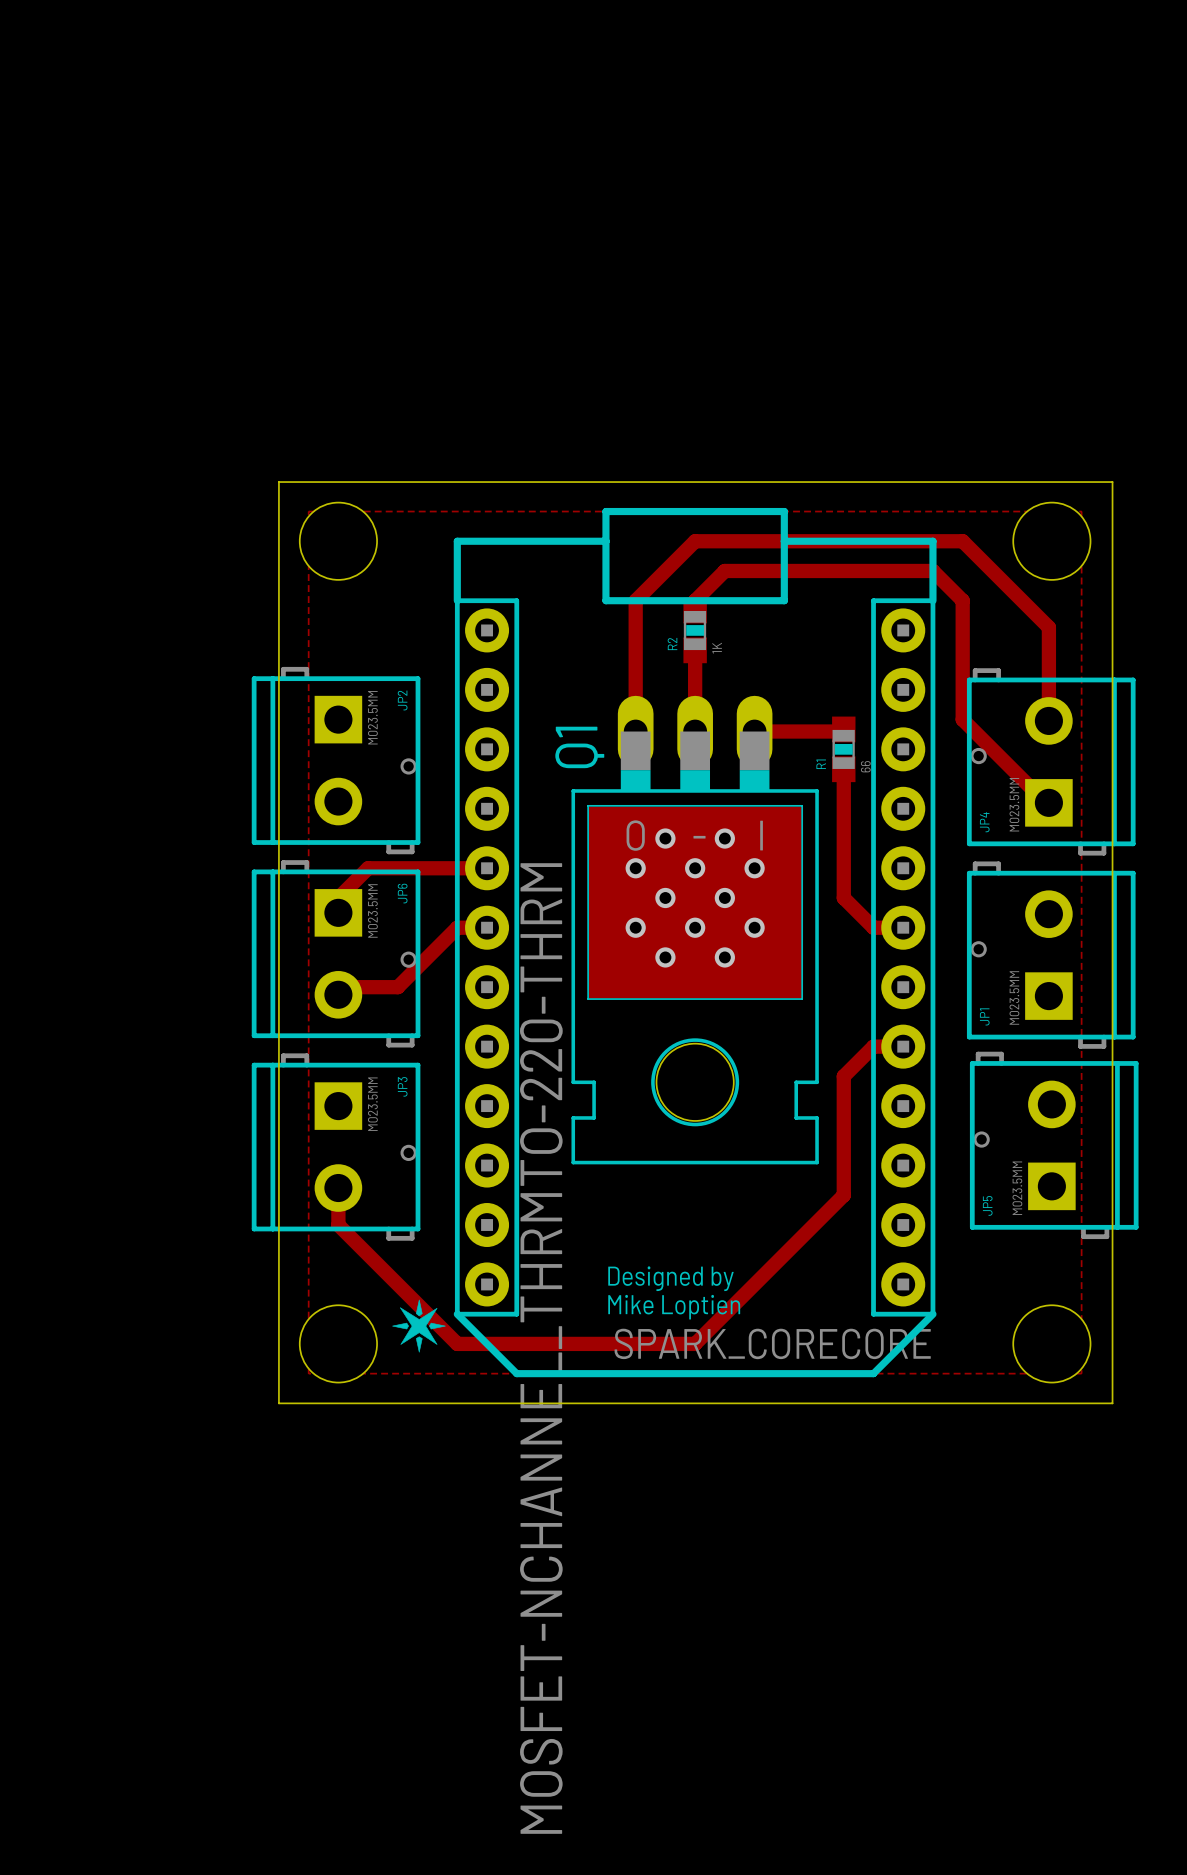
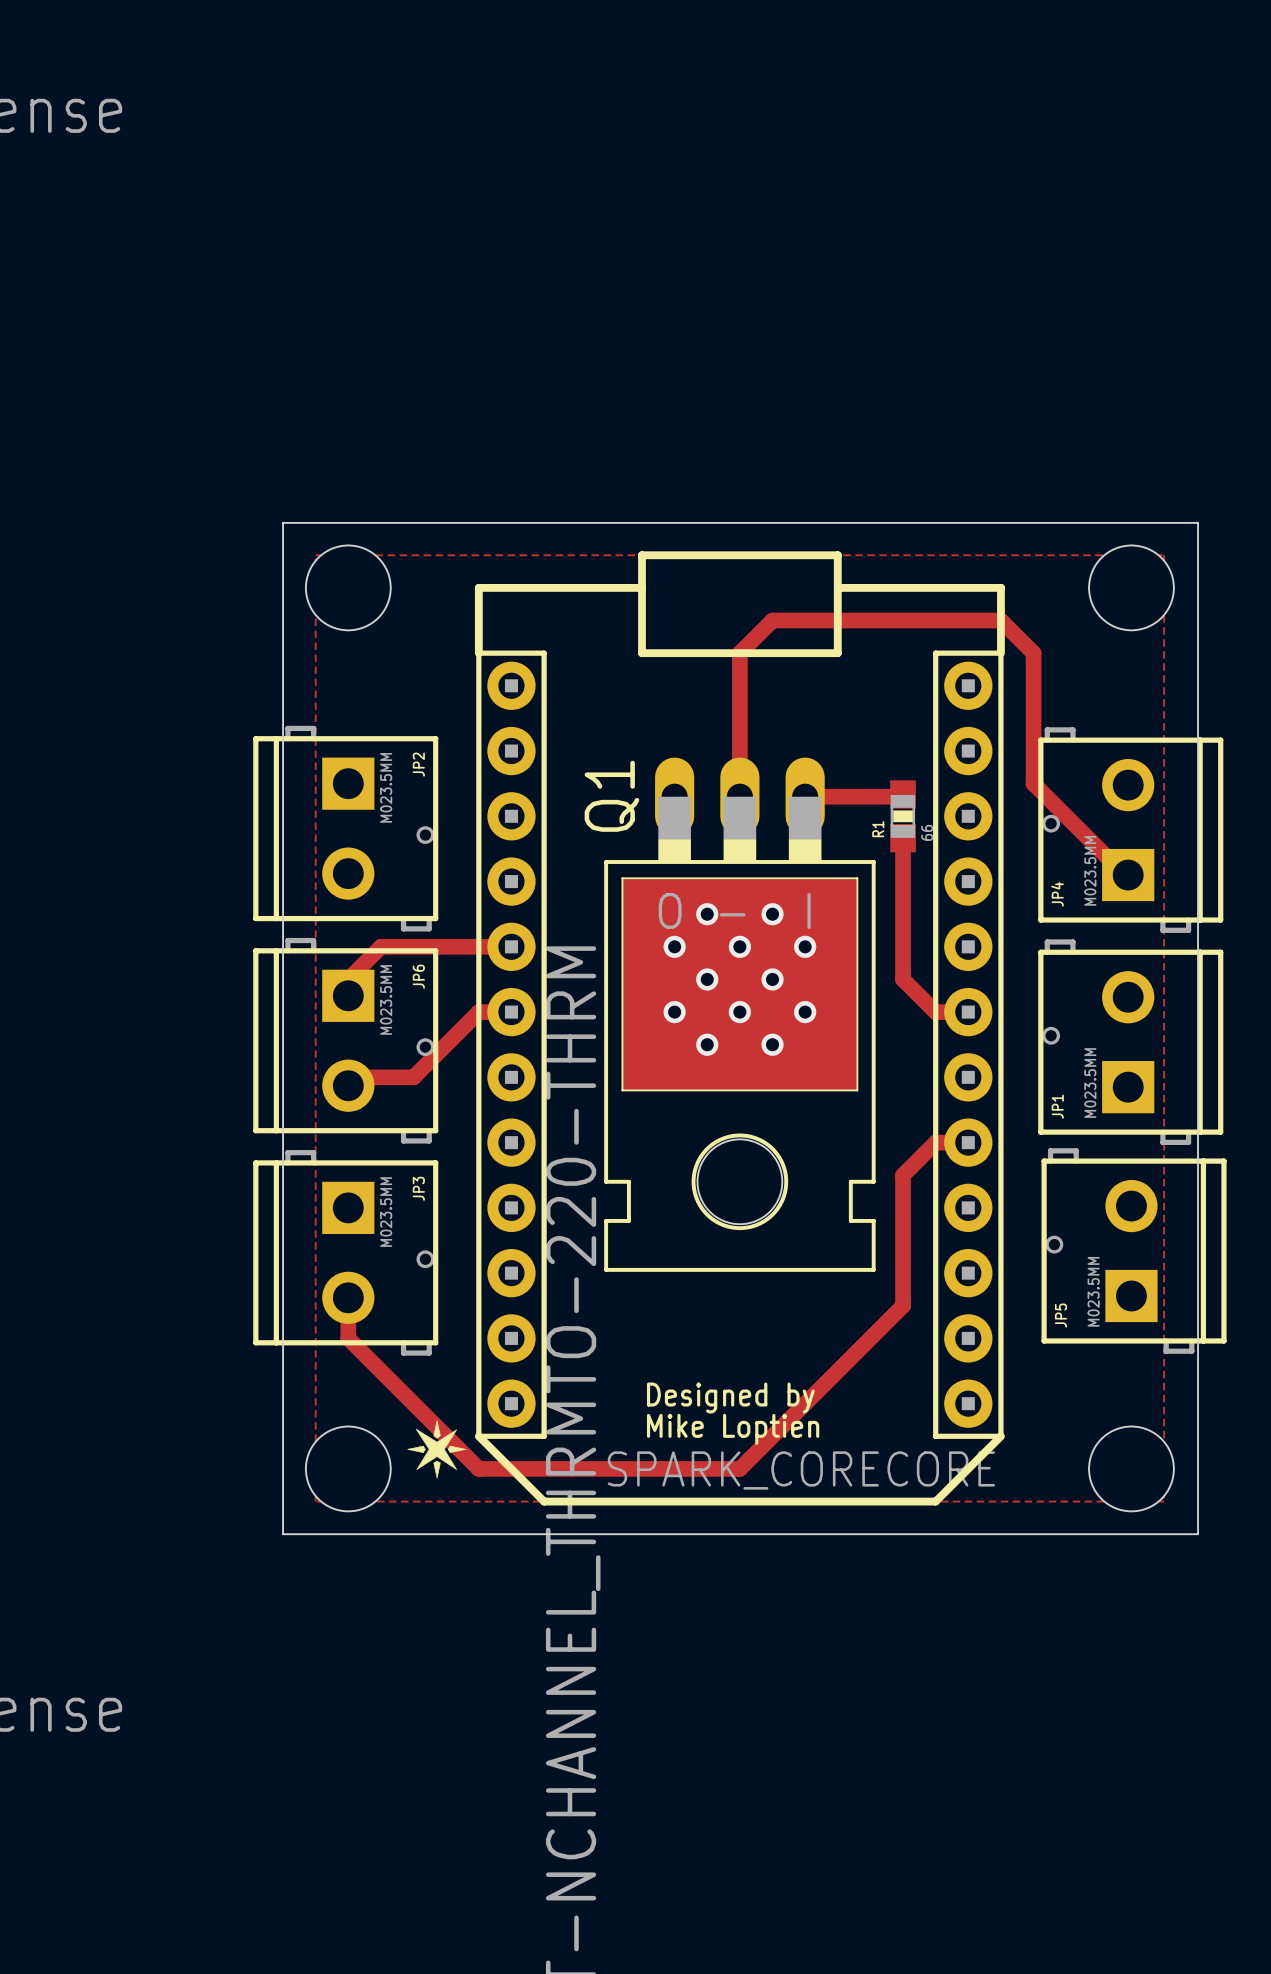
track: none -> (739, 663) (739, 707)
R2: 1K (695, 630) -> none
track: (1048, 720) (1048, 627) (962, 541) (695, 541) (635, 600) (635, 731) -> none

